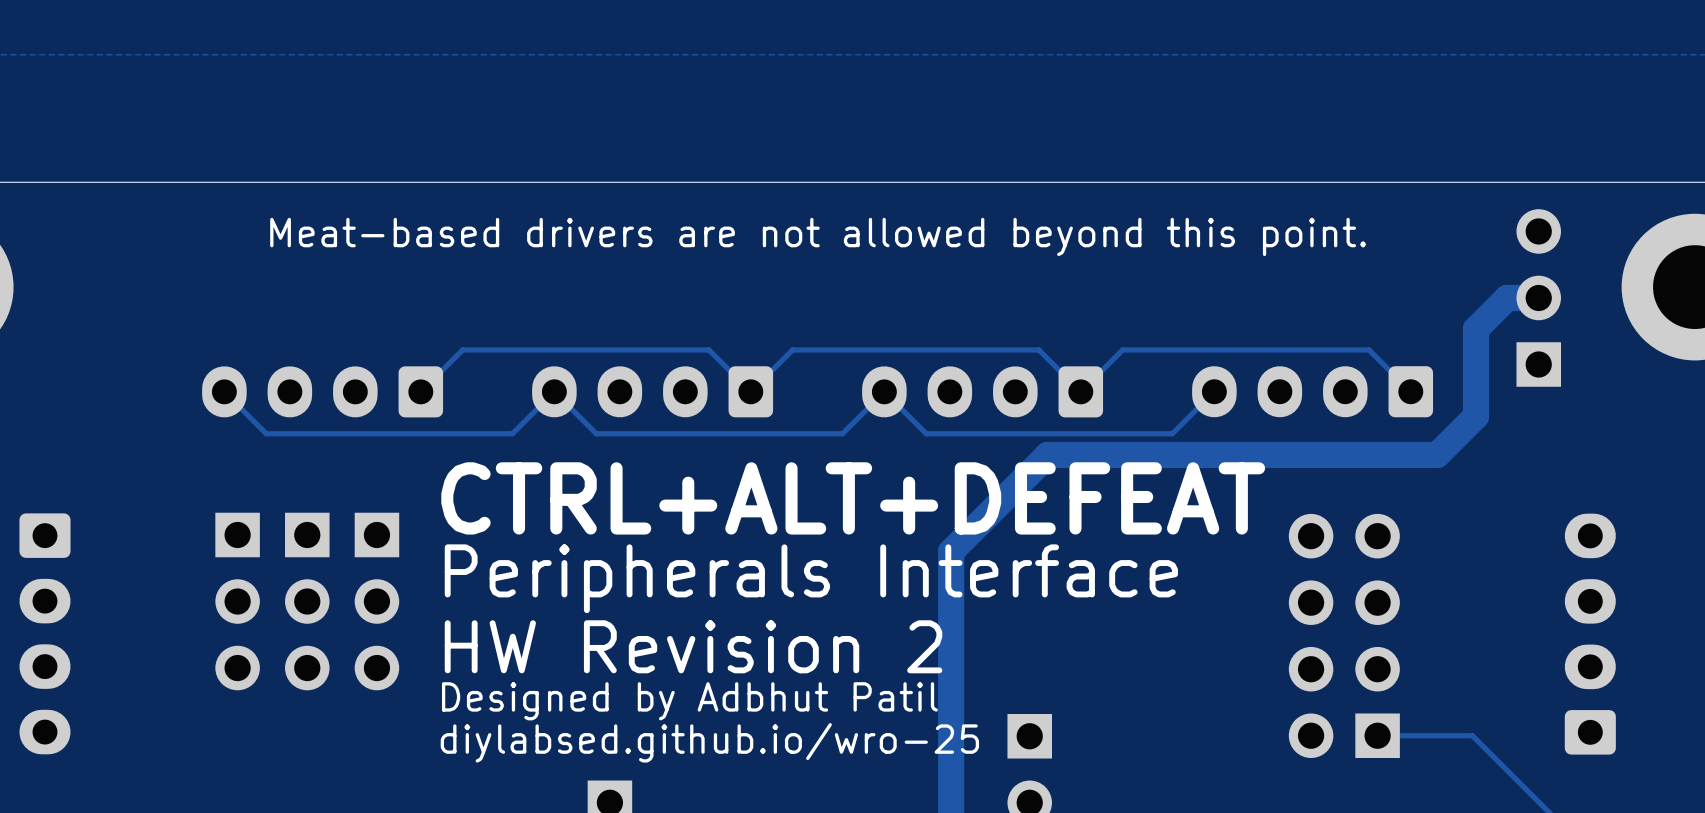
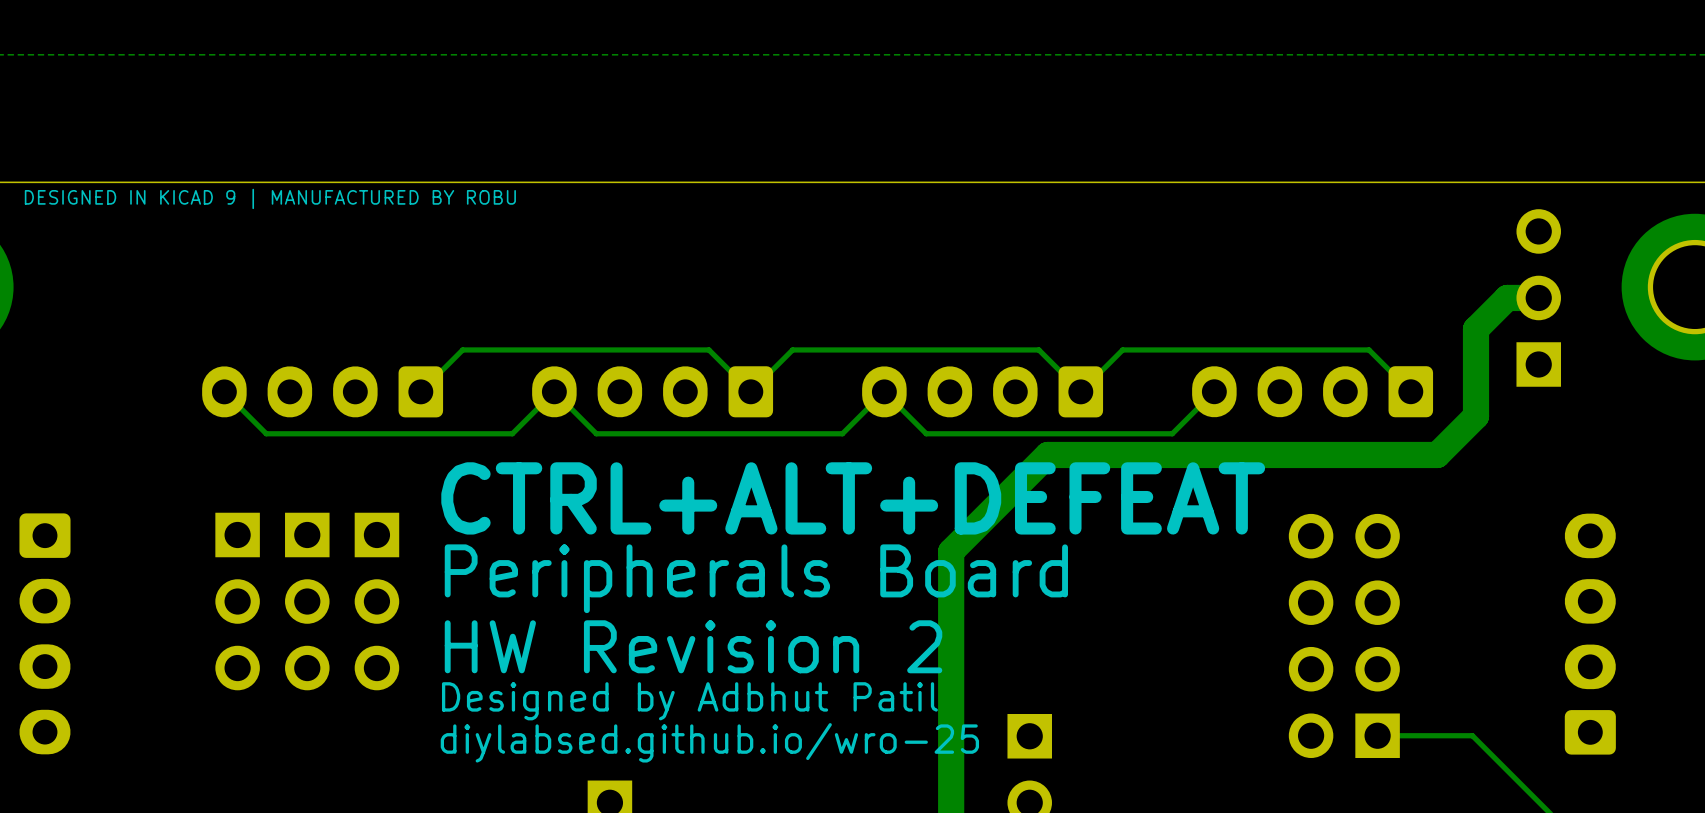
text: none -> DESIGNED IN KICAD 9 | MANUFACTURED BY ROBU (270, 198)
text: Meat-based drivers are not allowed beyond this point. (818, 236) -> none
text: Peripherals Interface (811, 578) -> Peripherals Board (756, 578)

